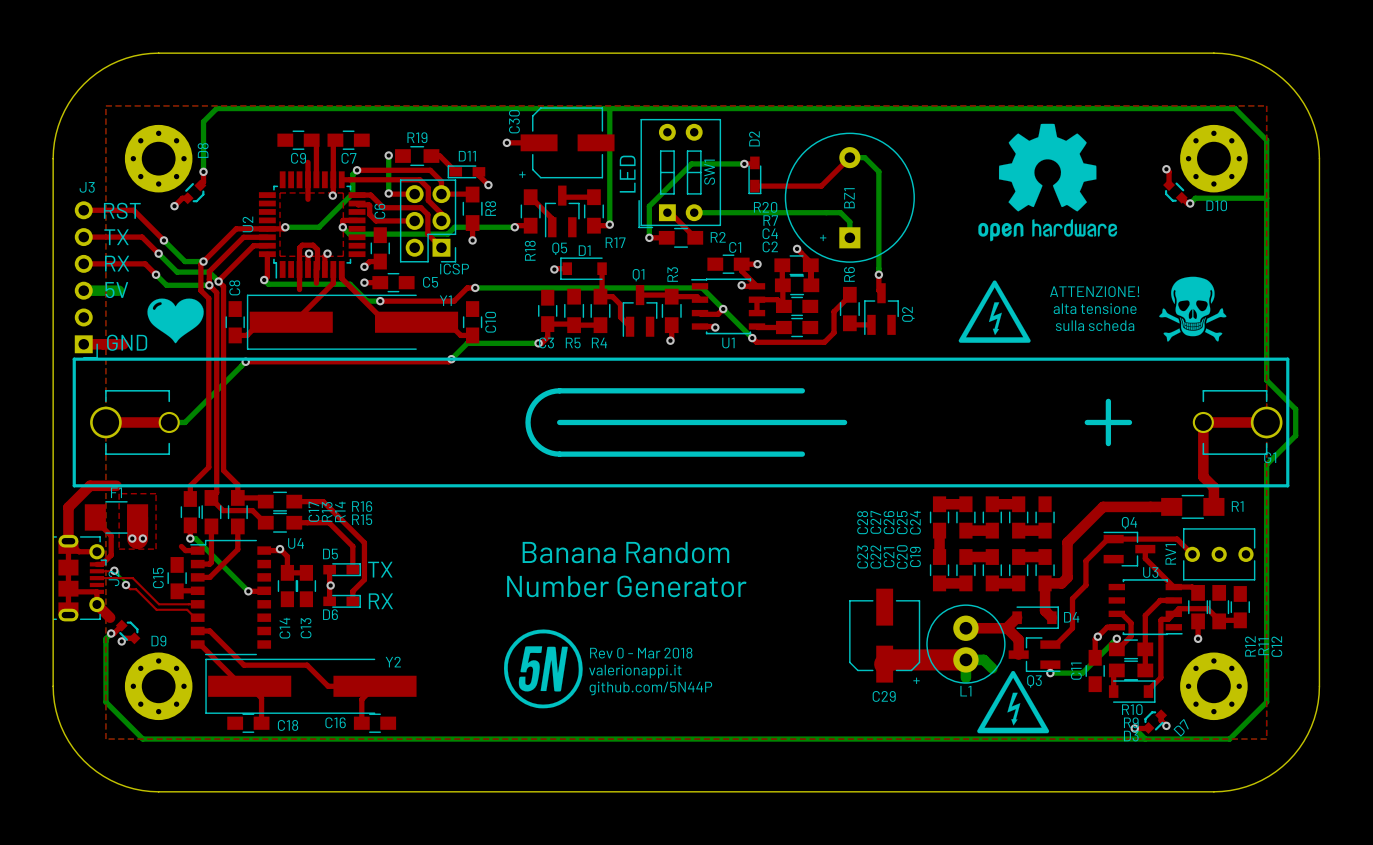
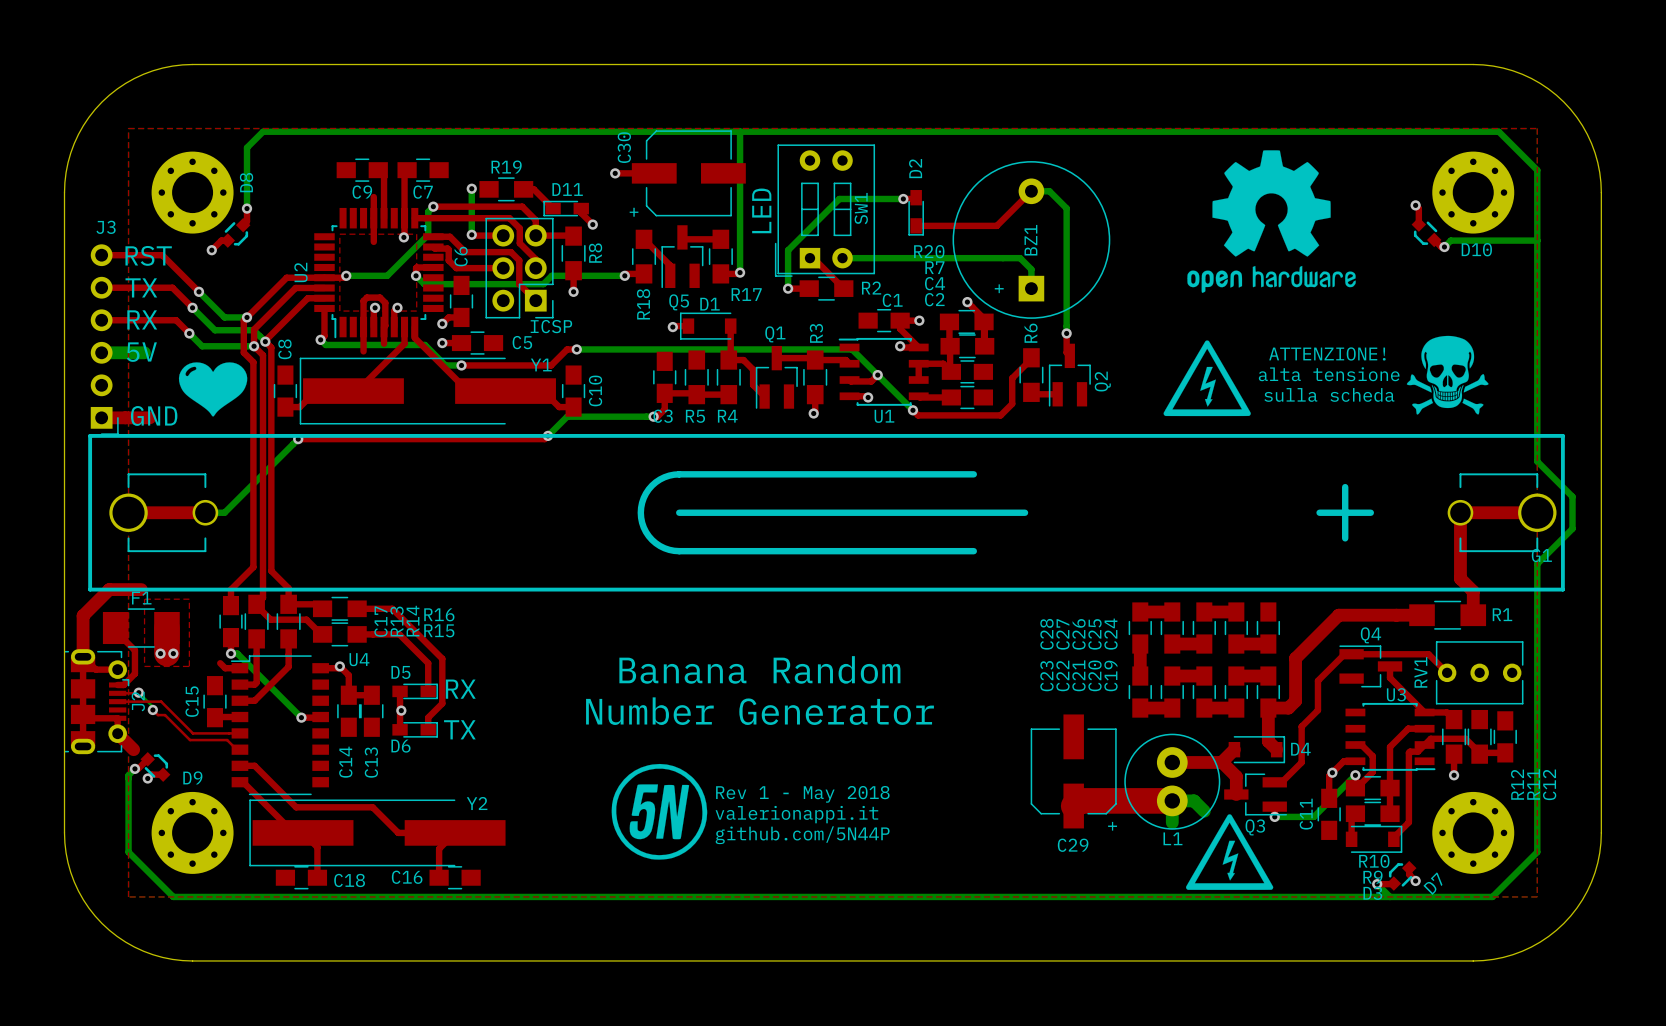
text: TX (380, 569) -> RX (460, 689)
text: RX (380, 601) -> TX (459, 729)
text: Rev 0 - Mar 2018 (641, 653) -> Rev 1 - May 2018 (802, 794)

